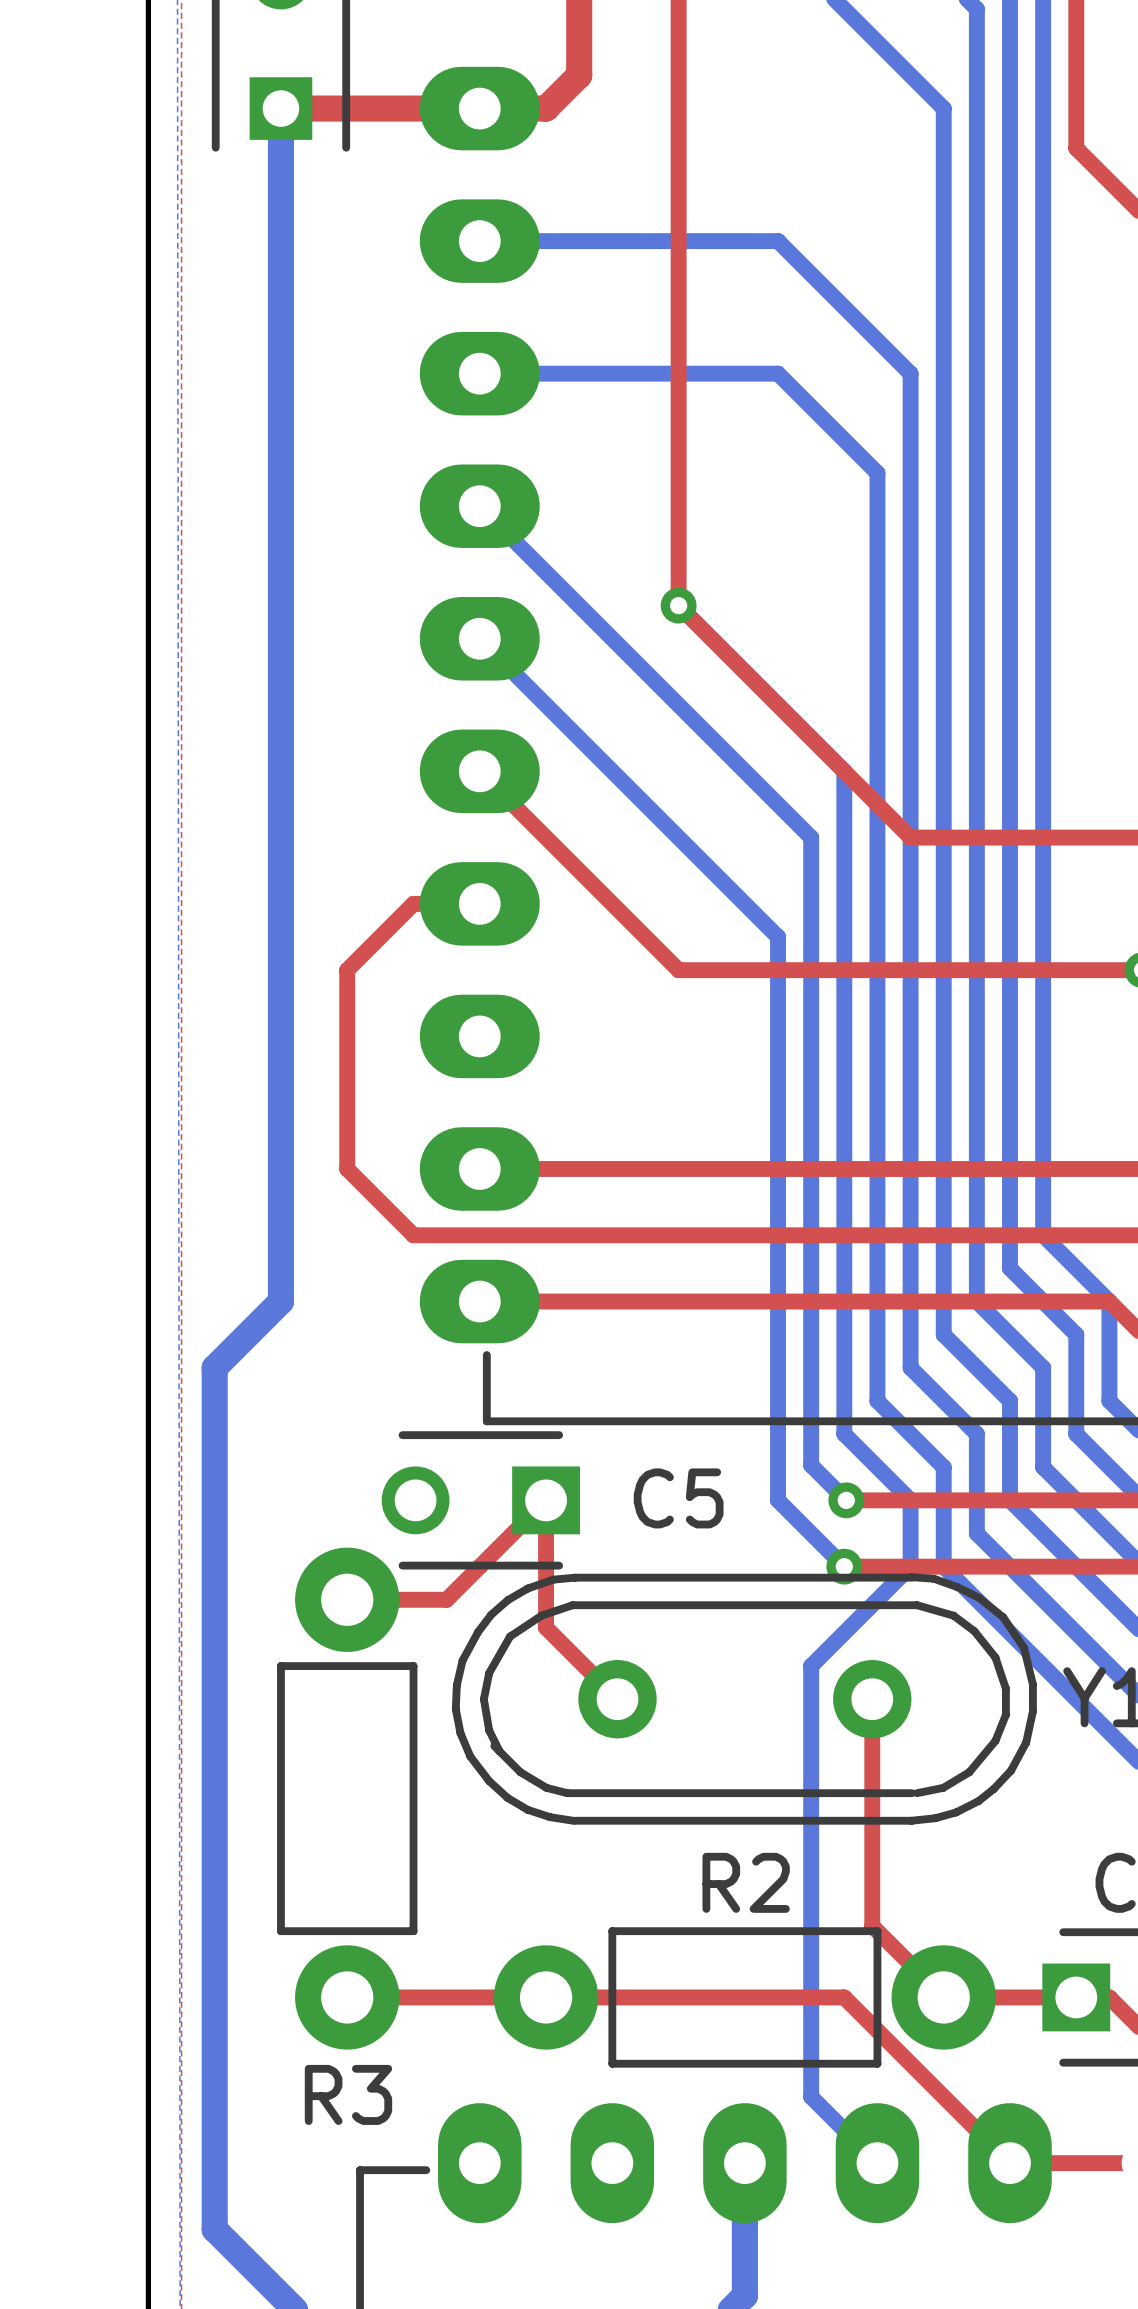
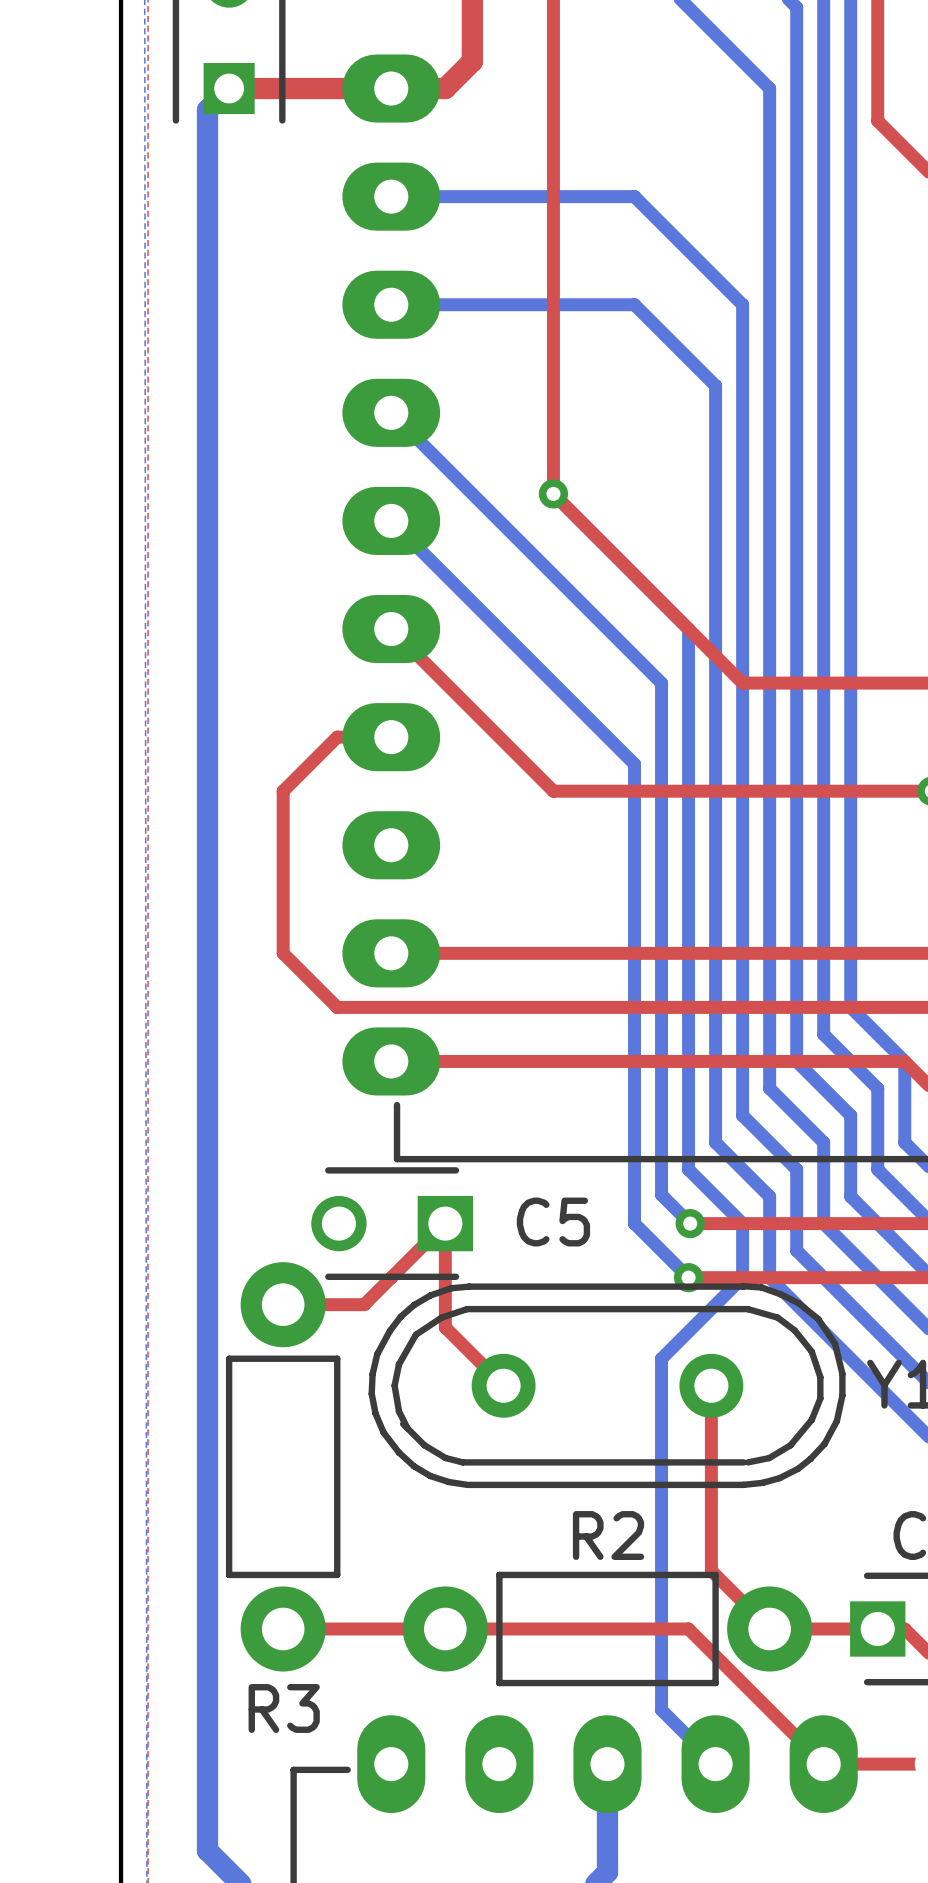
bottom track: (280, 108) (280, 1301) (214, 1367) (214, 2229) (254, 2269) -> (229, 88) (207, 110) (207, 1850)

